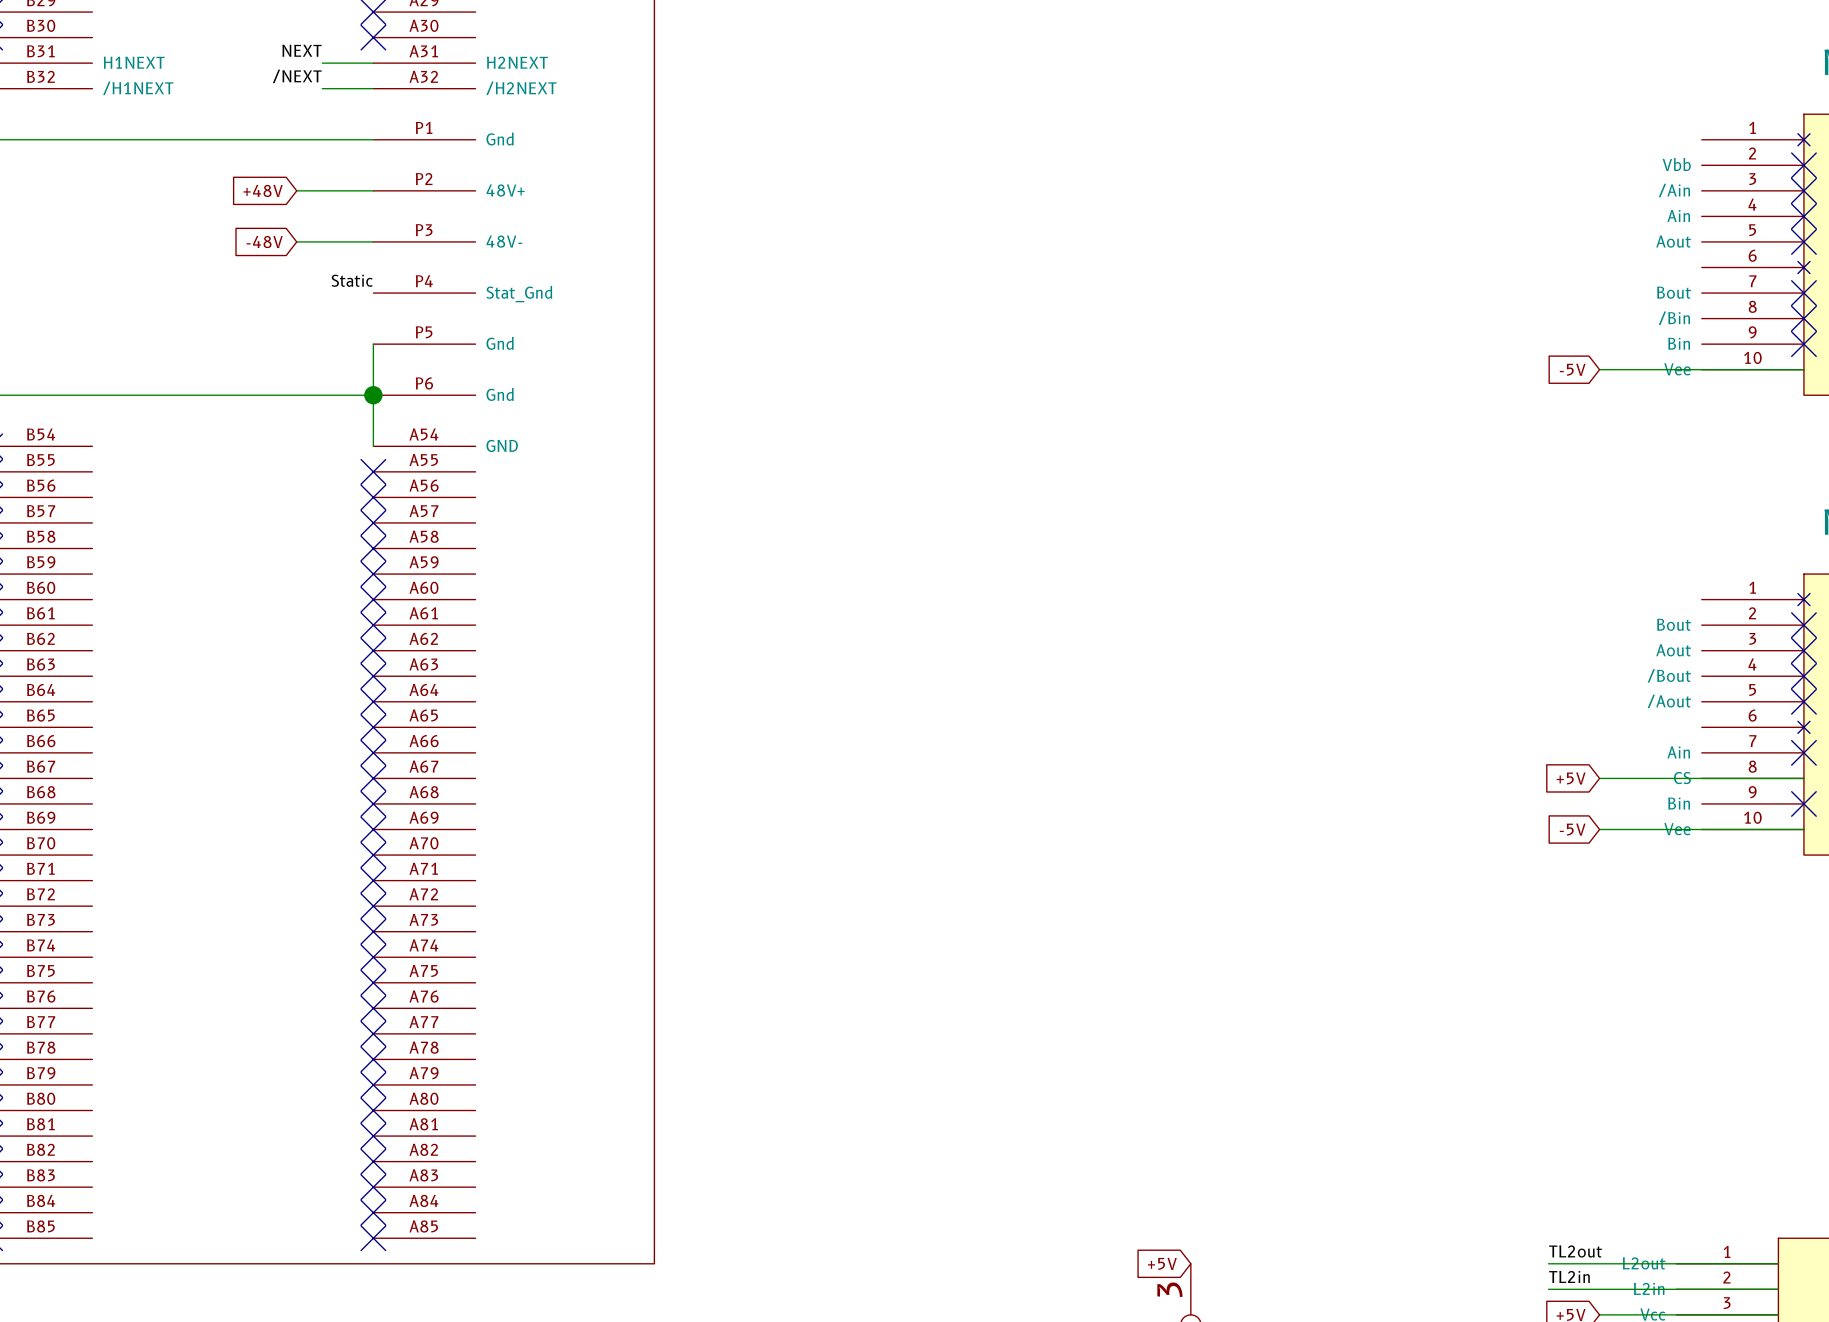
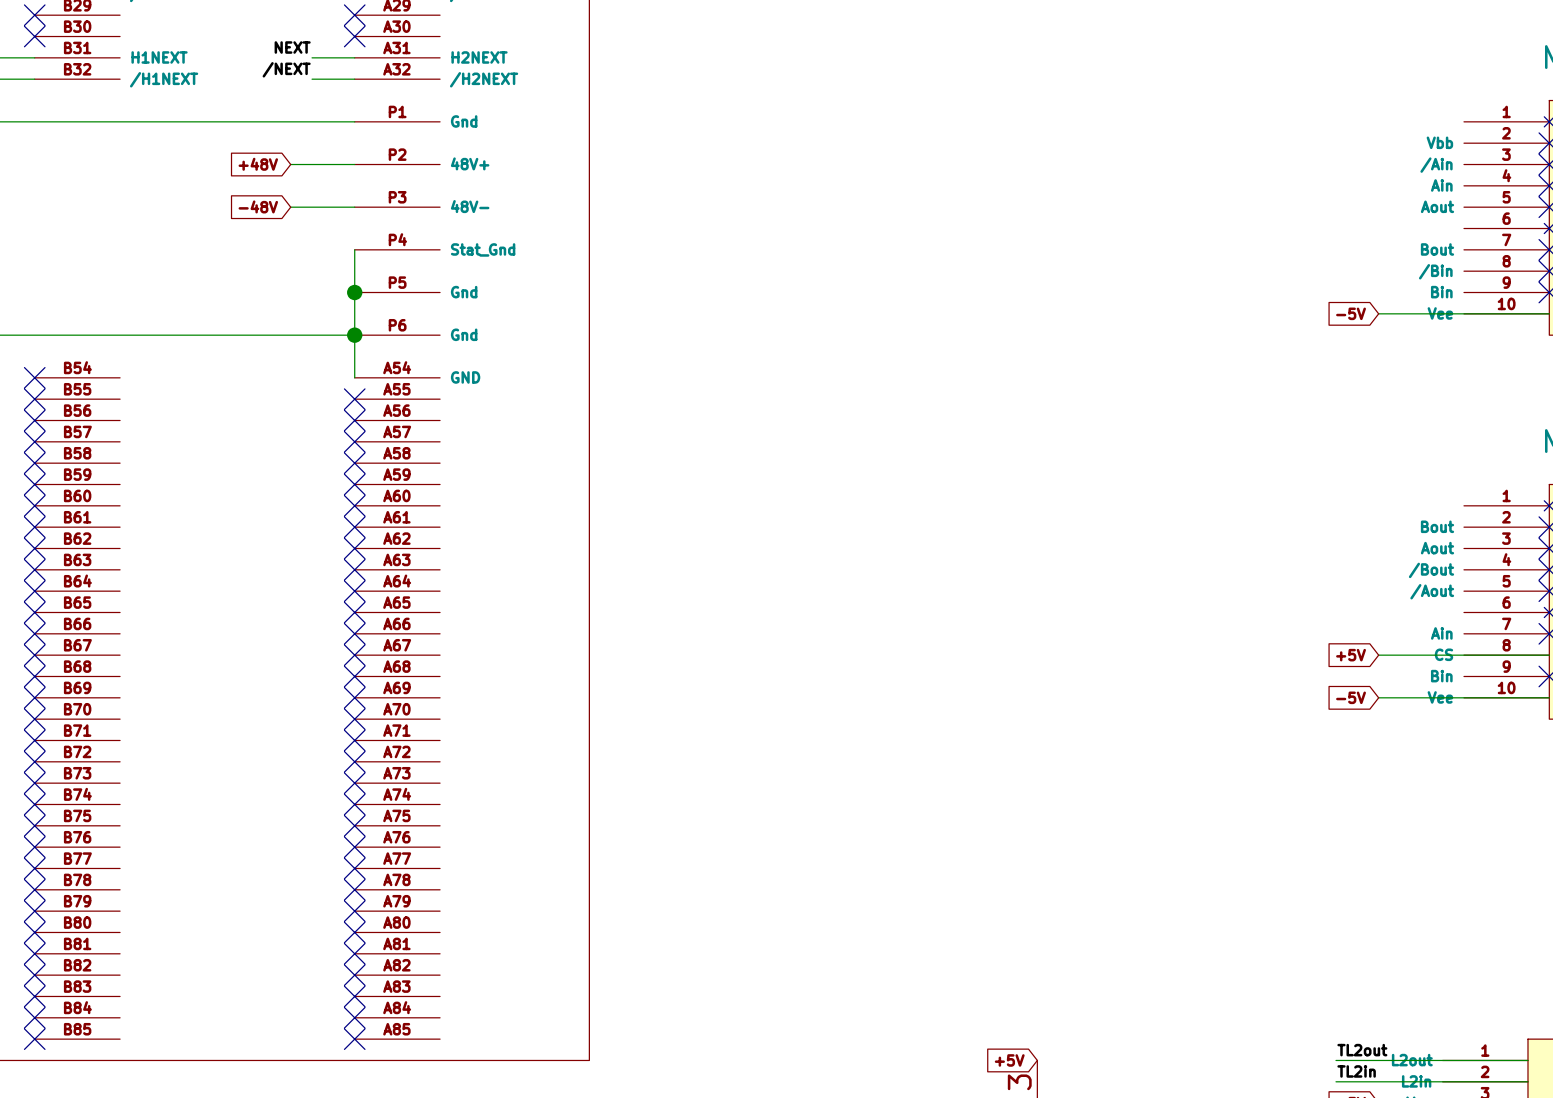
label: Static (352, 280) -> none
wire: none -> (354, 249) (354, 292)
junction: none -> (354, 292)

